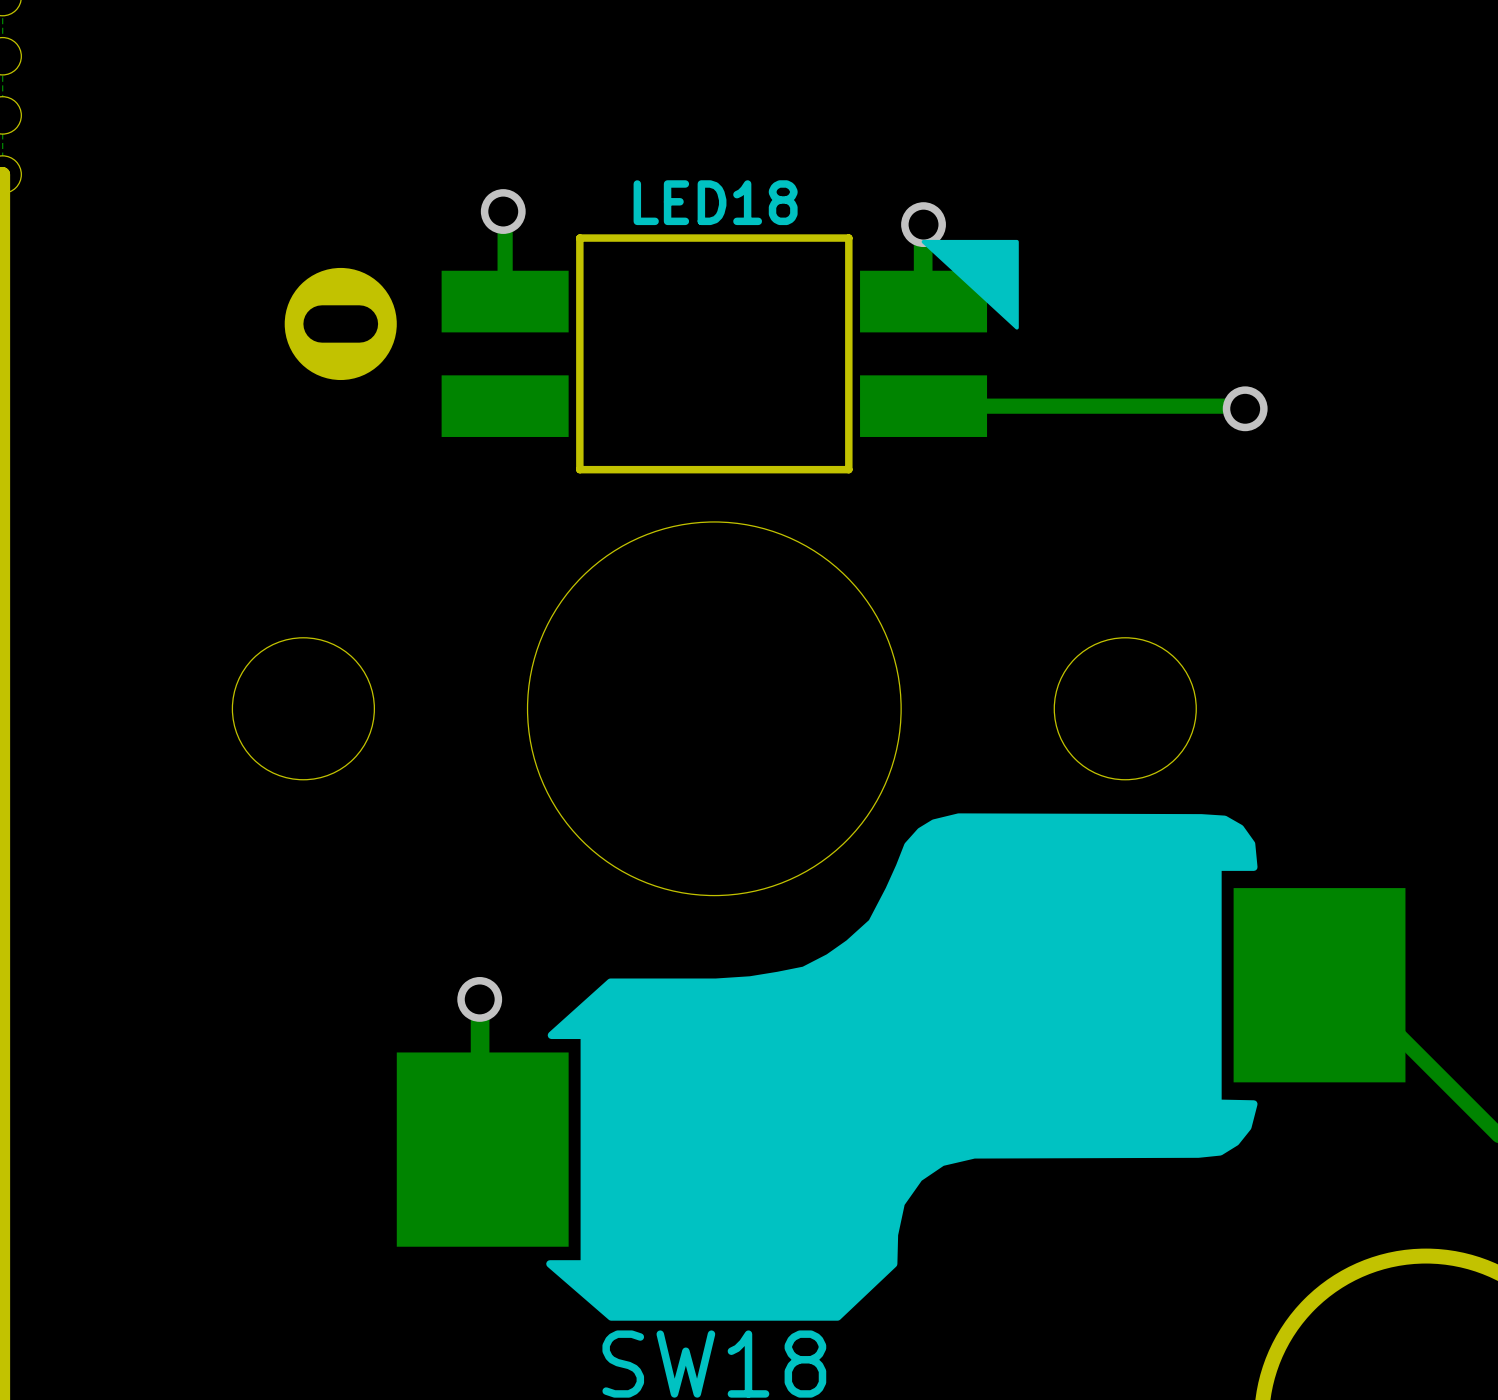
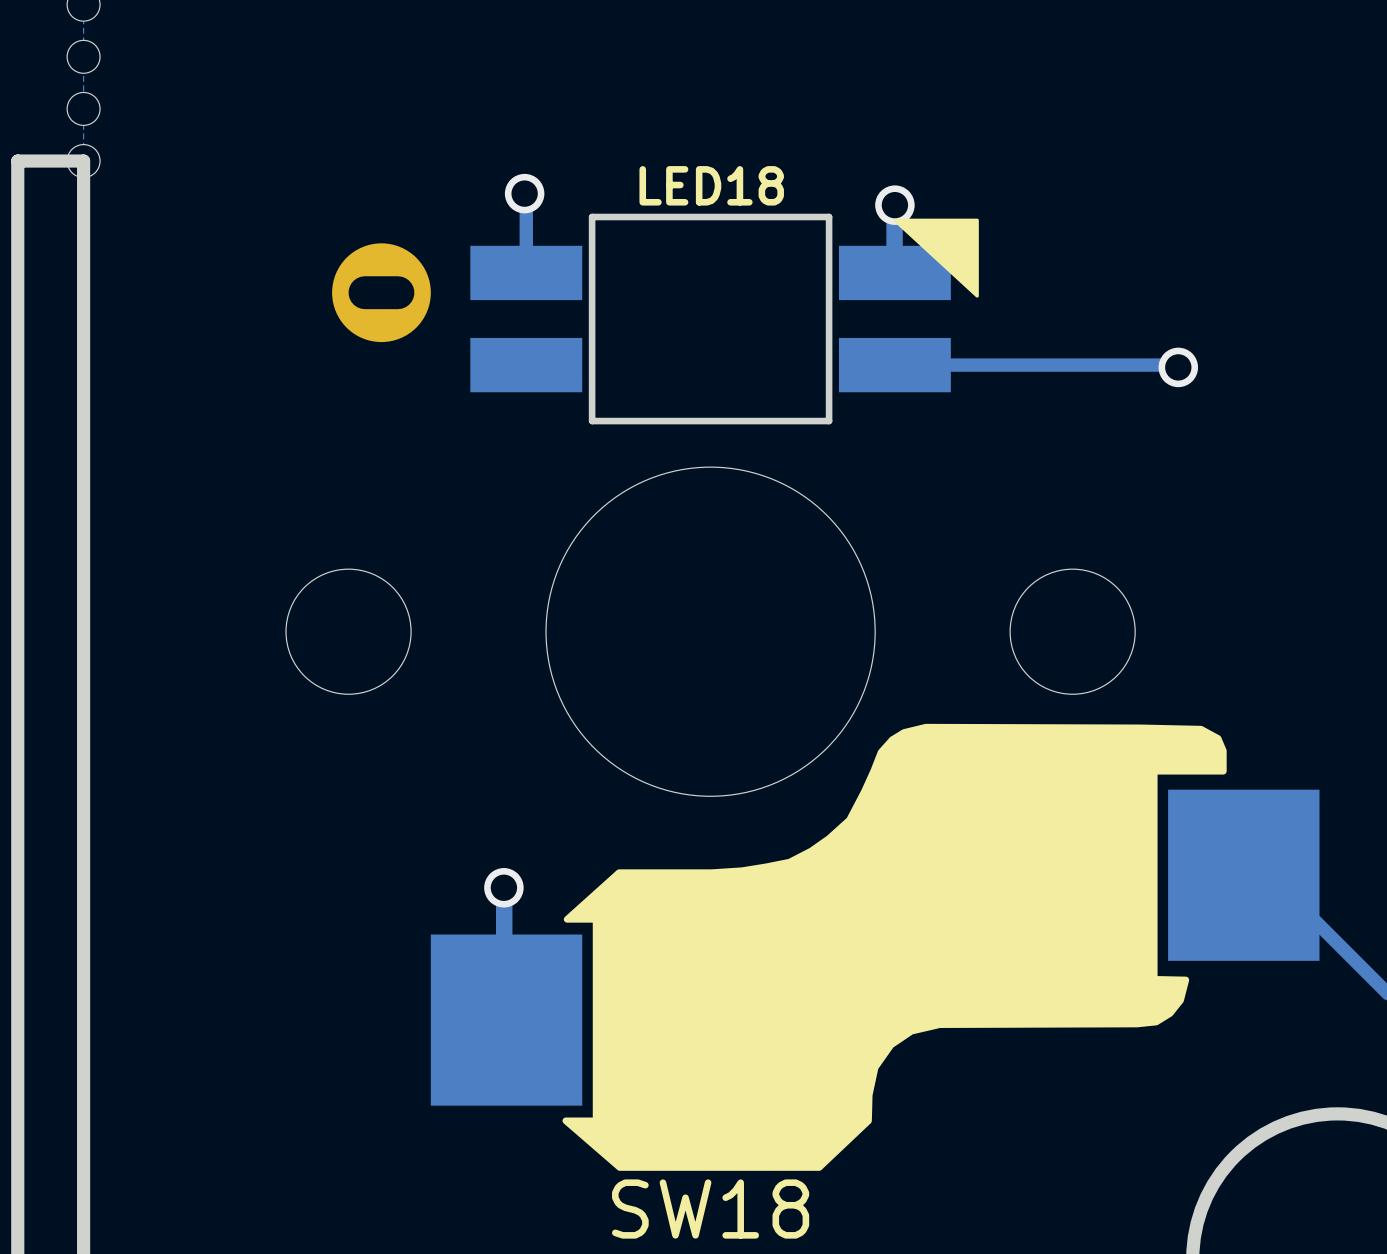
SW18 footprint: [232, 267, 1406, 1321] -> [286, 243, 1320, 1171]

